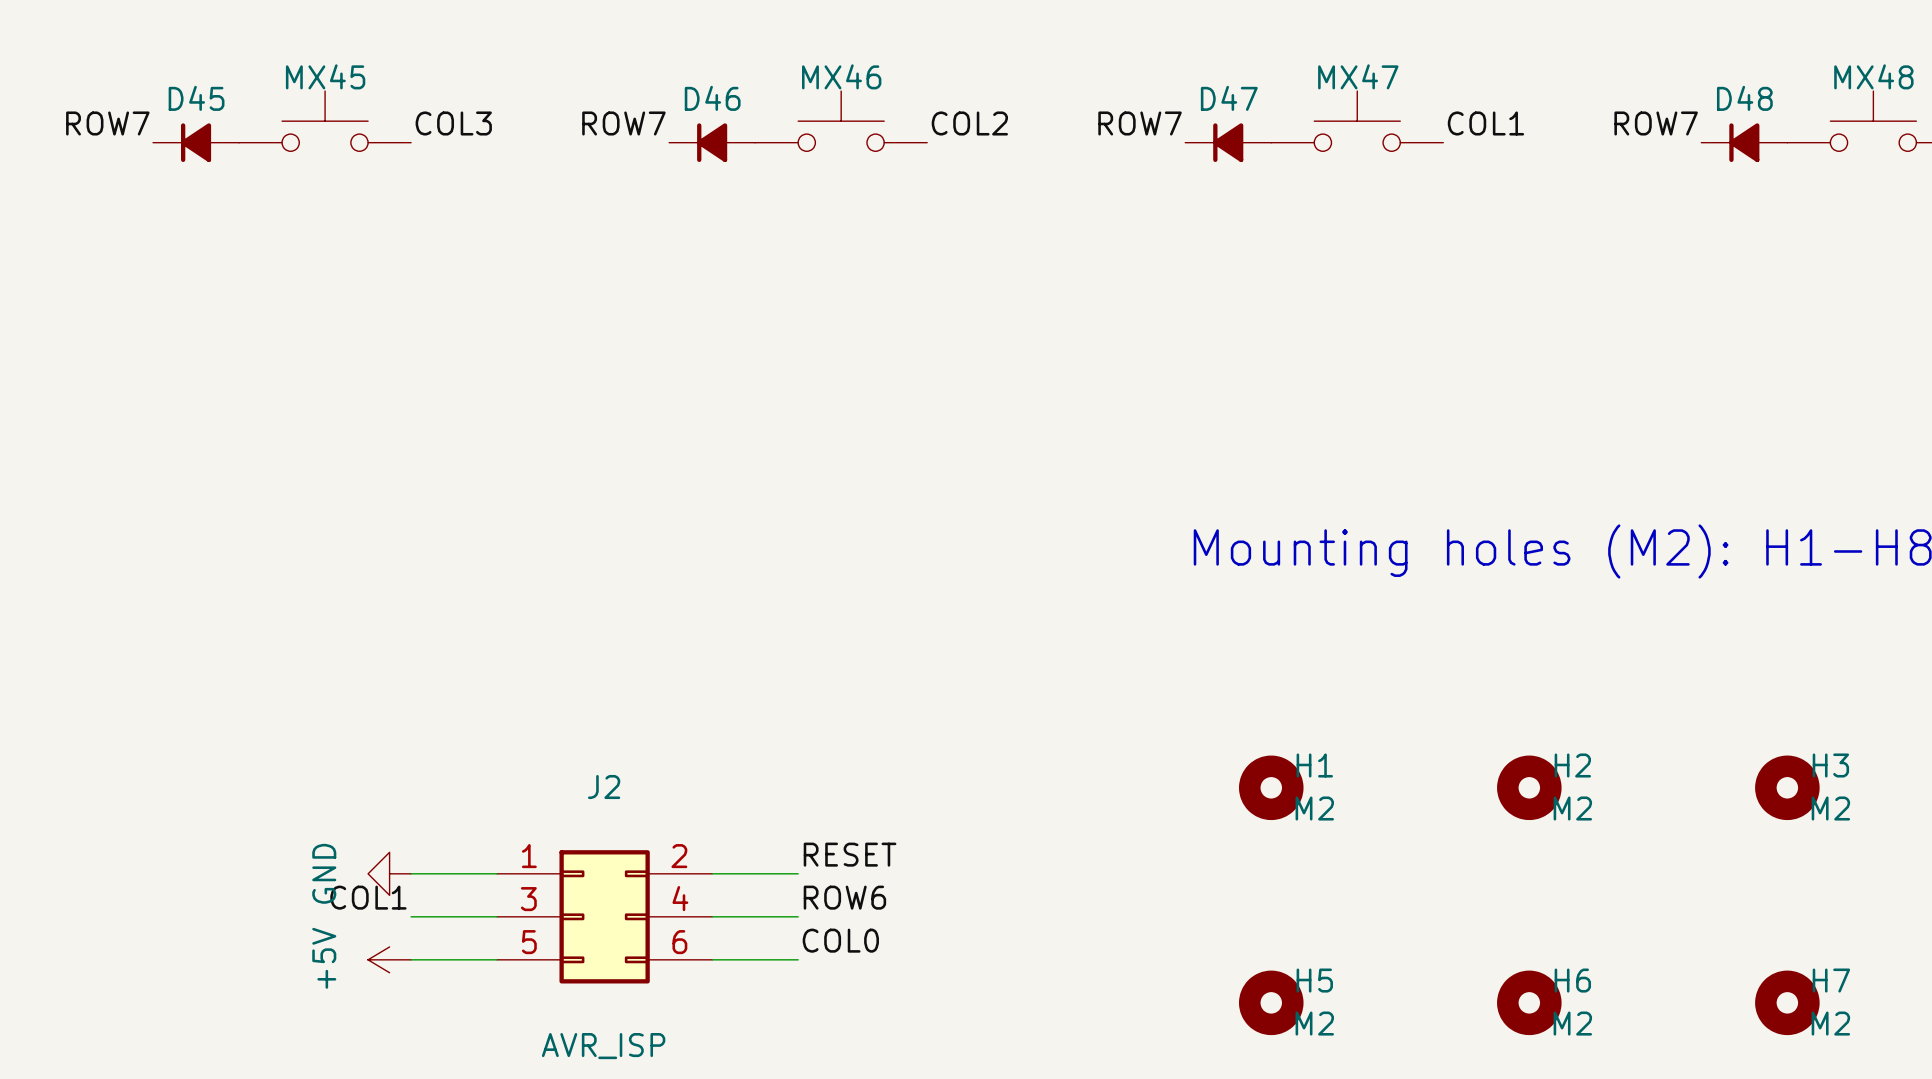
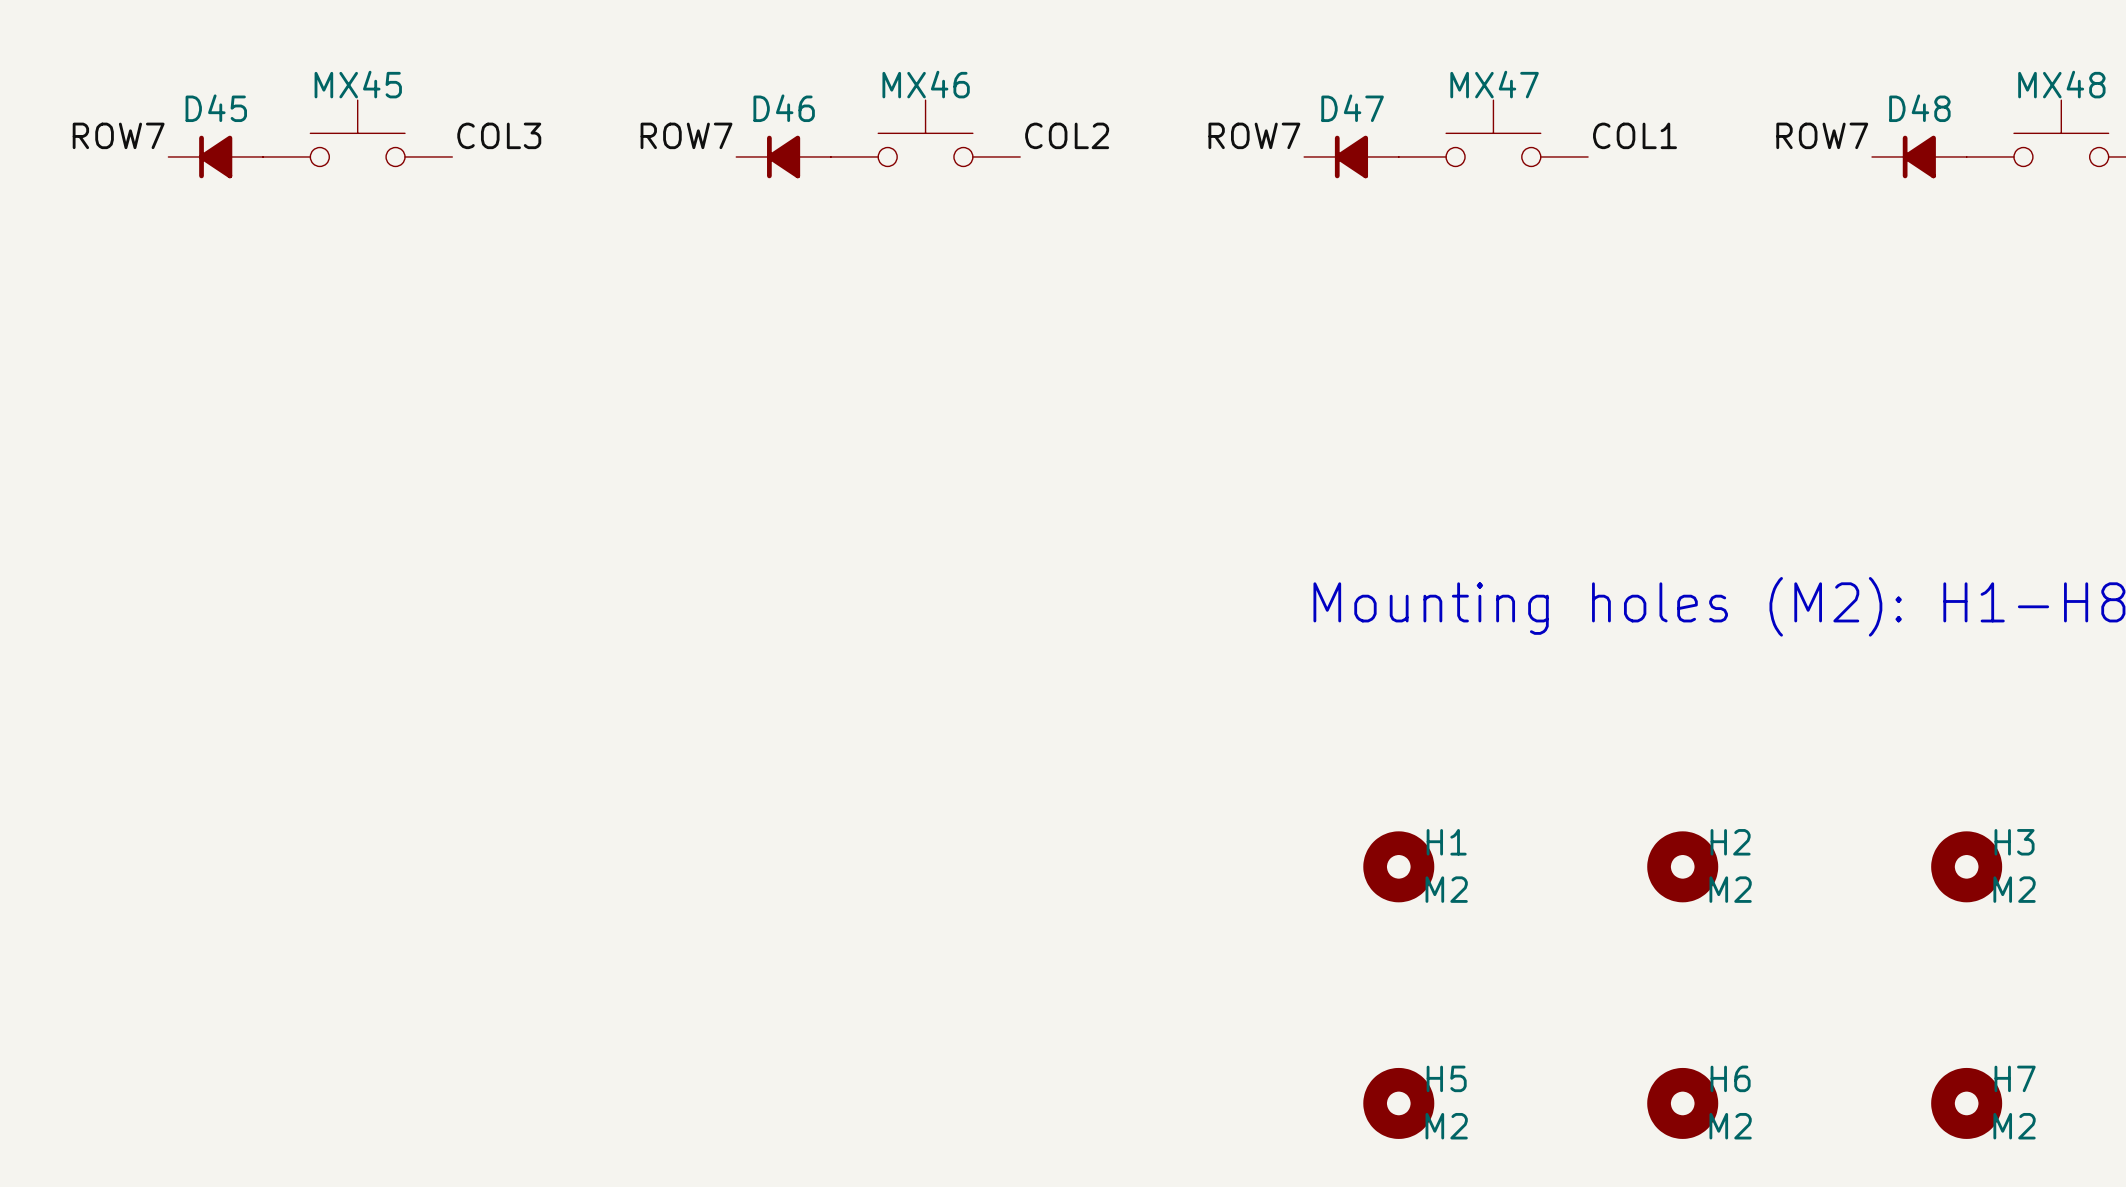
label: RESET (850, 854) -> none
power symbol: GND (389, 873) -> none
wire: (411, 873) (497, 873) -> none
wire: (712, 873) (798, 873) -> none
label: COL1 (368, 897) -> none
label: ROW6 (844, 897) -> none
wire: (411, 916) (497, 916) -> none
J2: AVR_ISP (604, 916) -> none
wire: (712, 916) (798, 916) -> none
label: COL0 (840, 940) -> none
power symbol: +5V (389, 959) -> none
wire: (411, 959) (497, 959) -> none
wire: (712, 959) (798, 959) -> none

